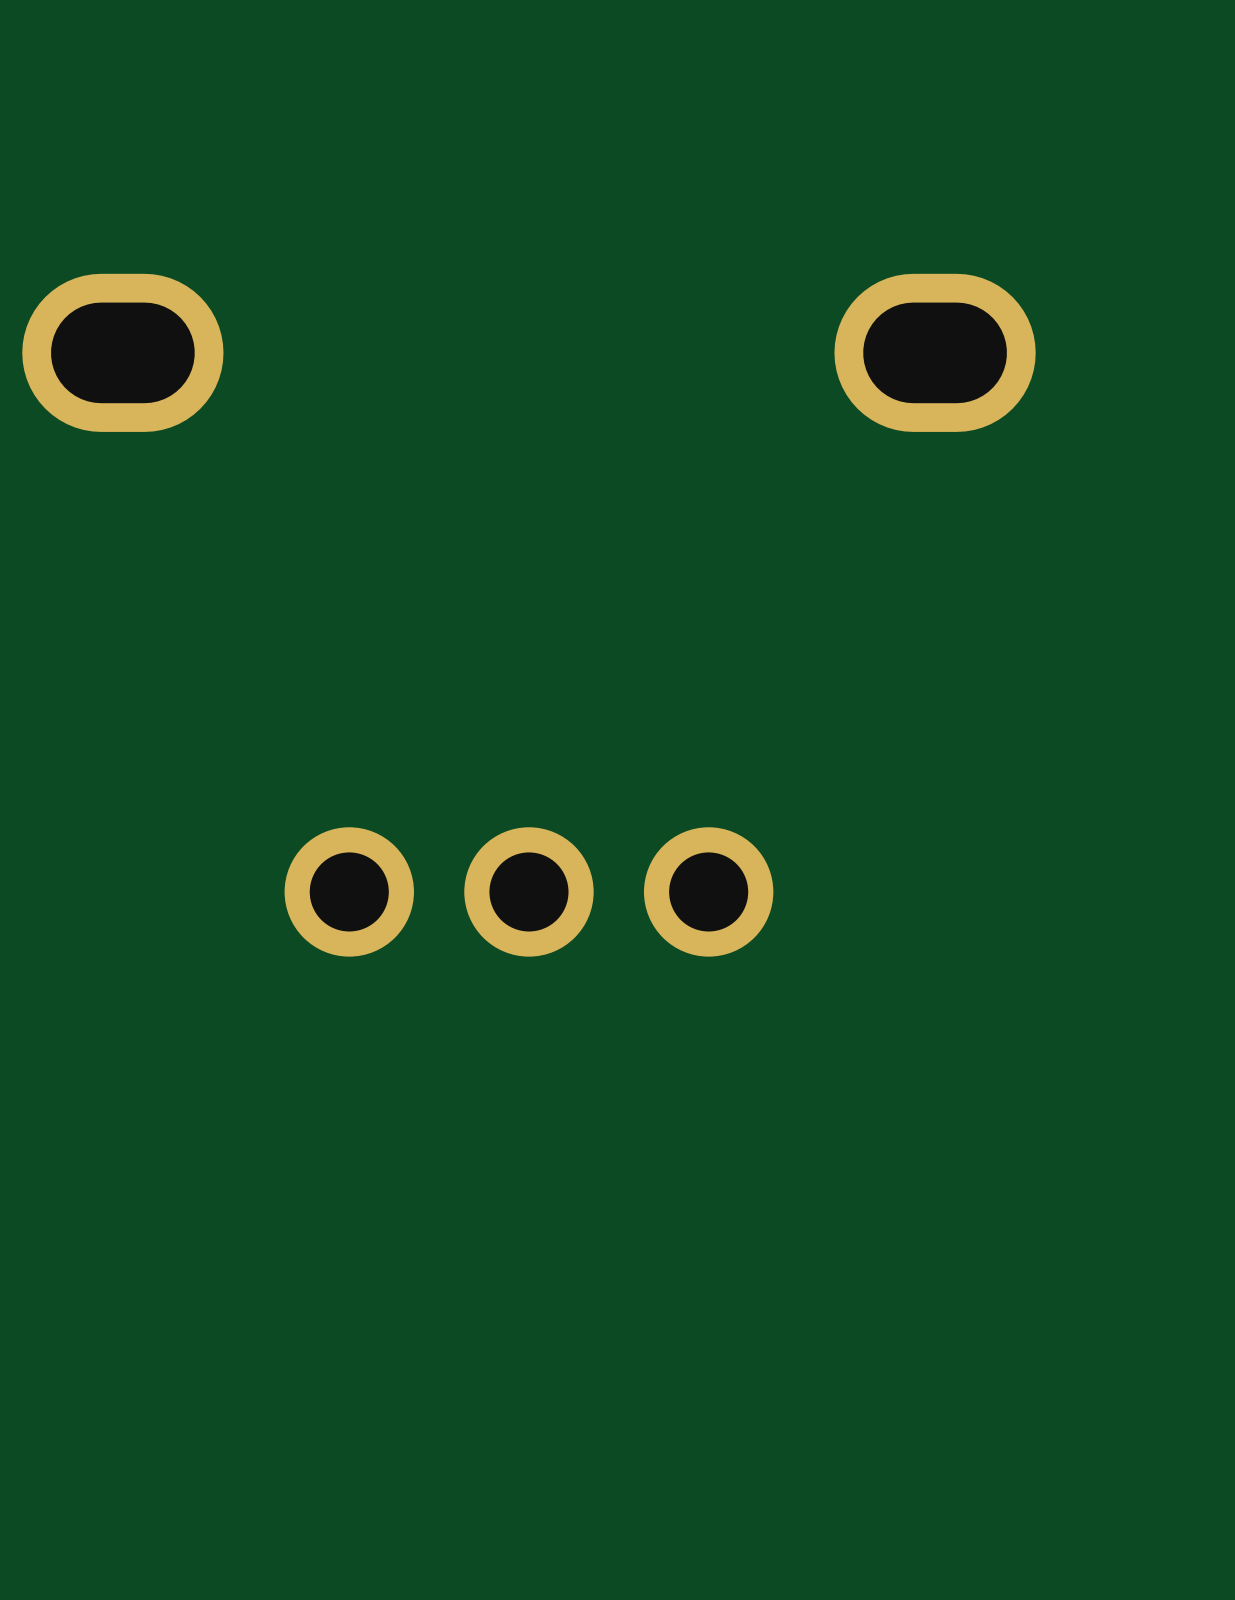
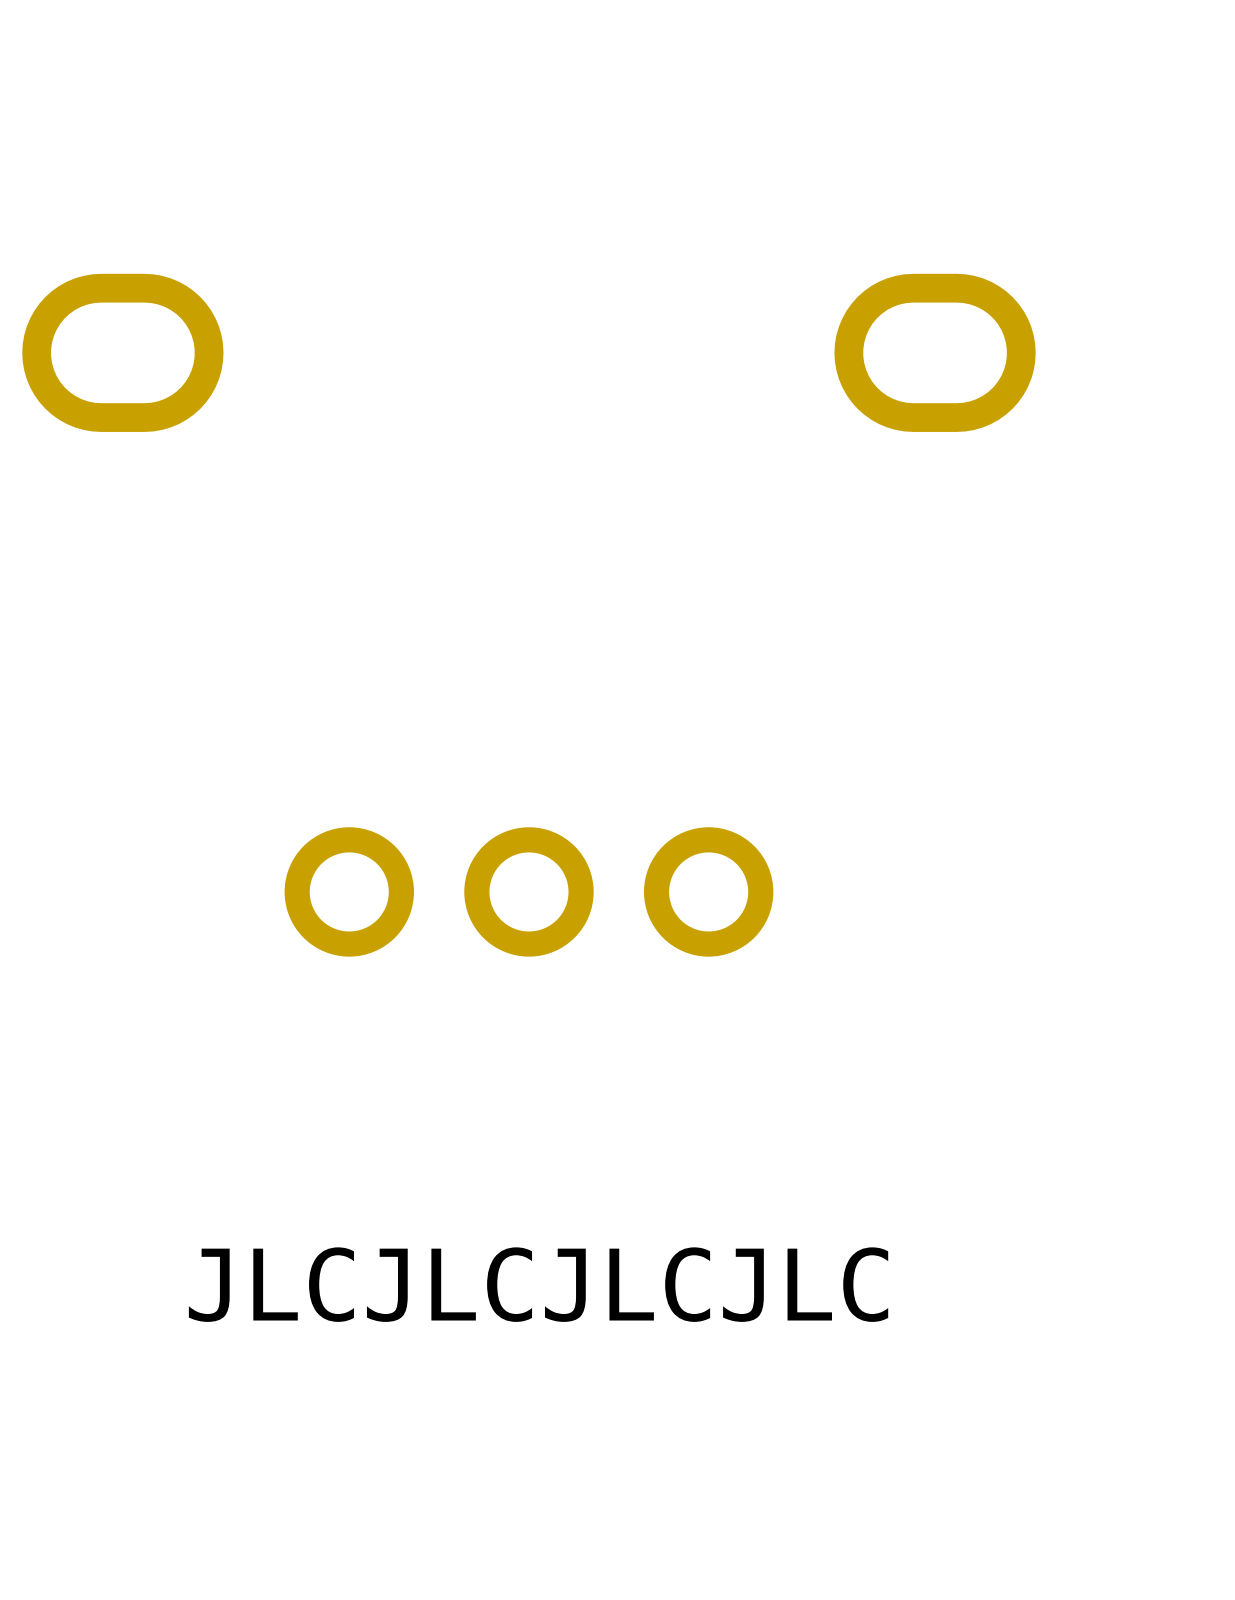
text: none -> JLCJLCJLCJLC (538, 1284)

